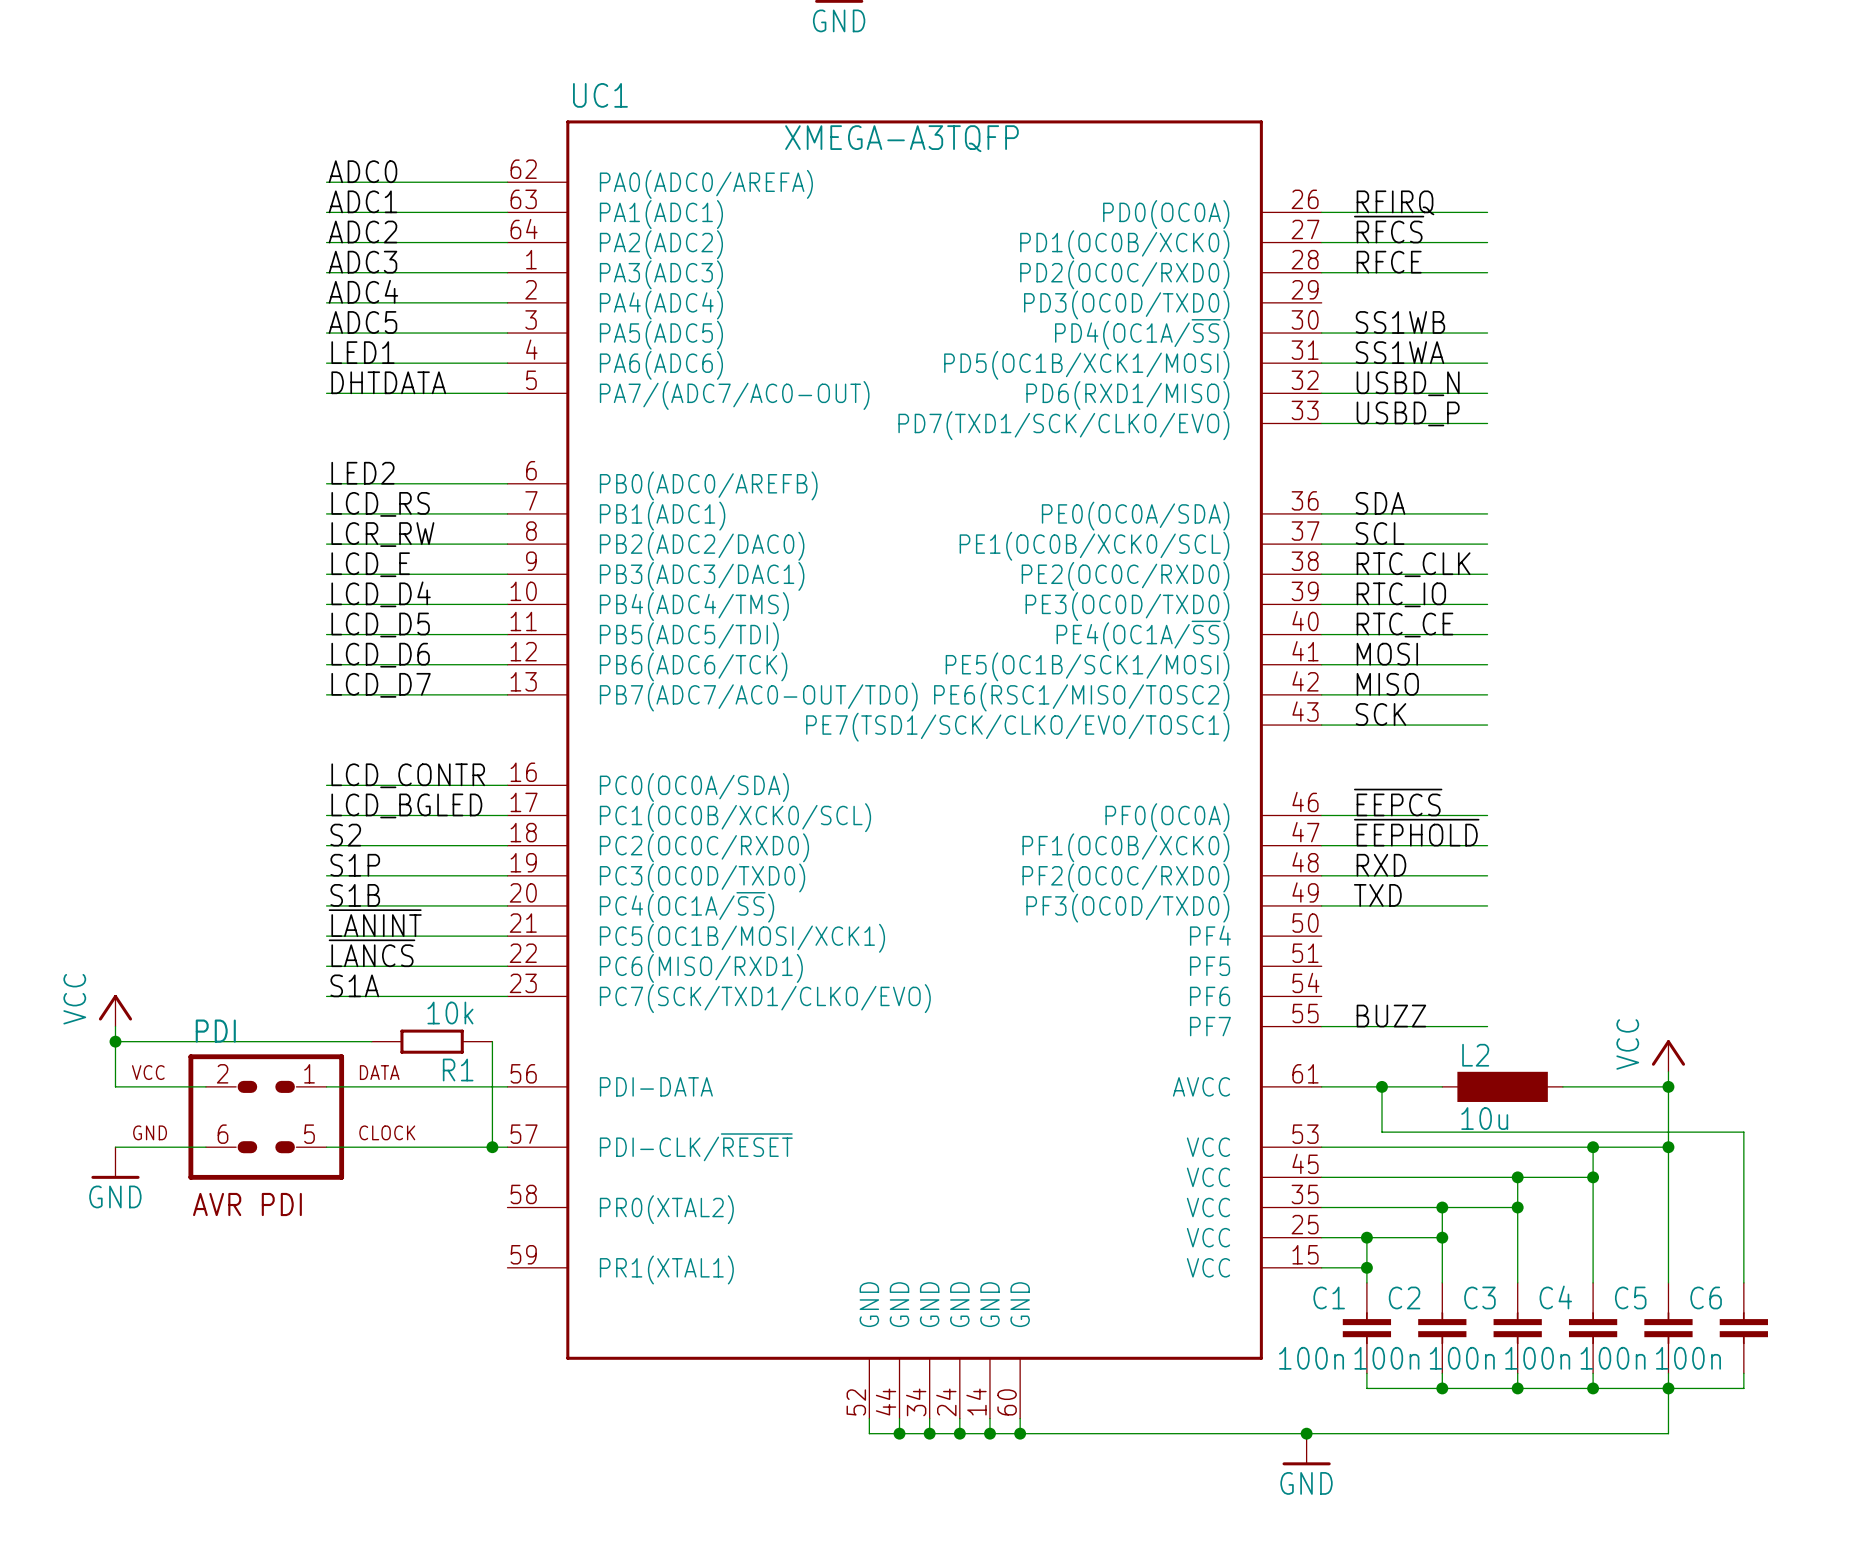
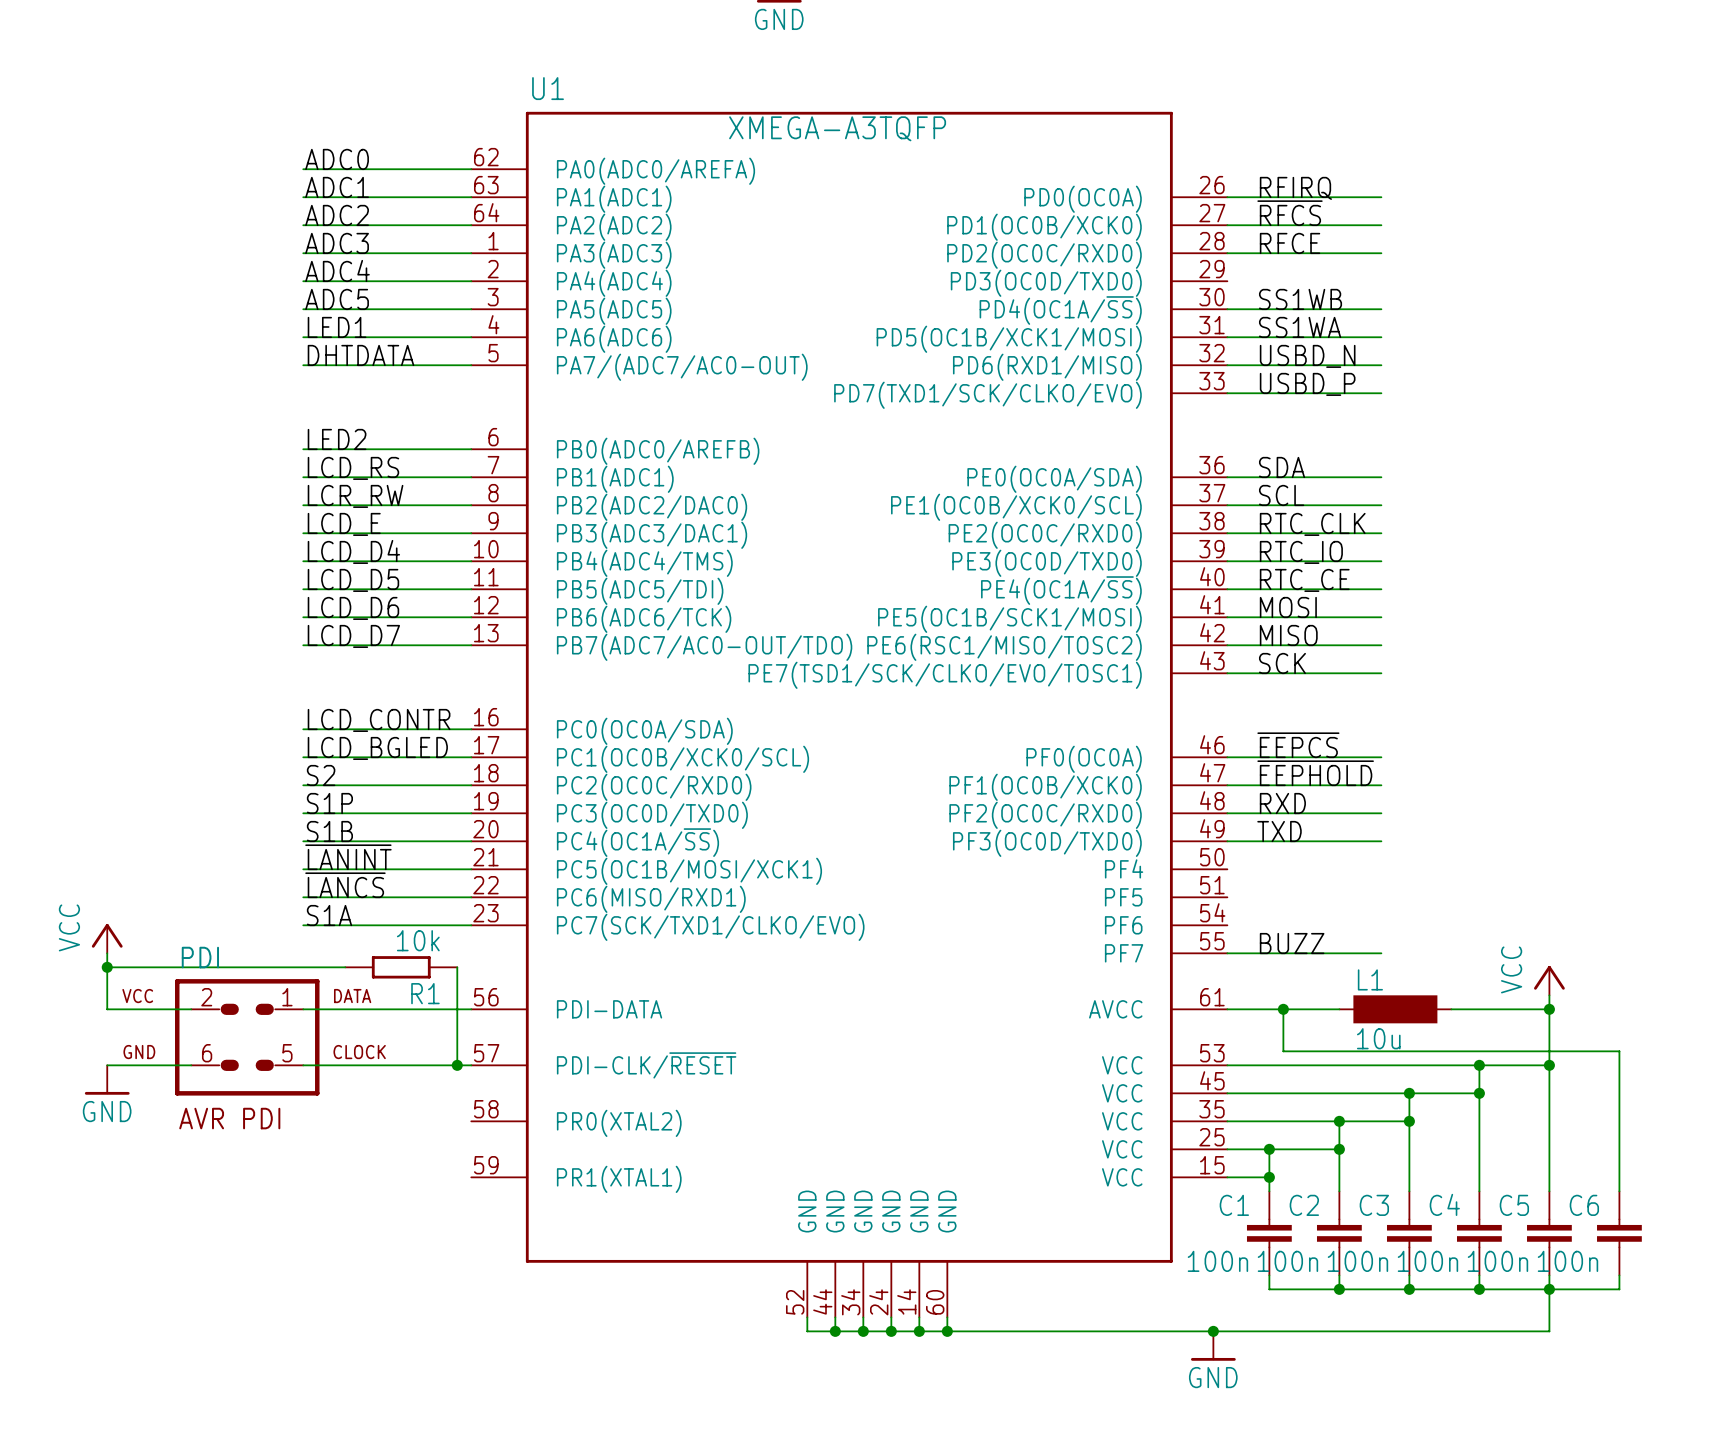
UC1 name: UC1 (600, 95) -> U1 (548, 88)
L2 name: L2 (1475, 1055) -> L1 (1370, 979)

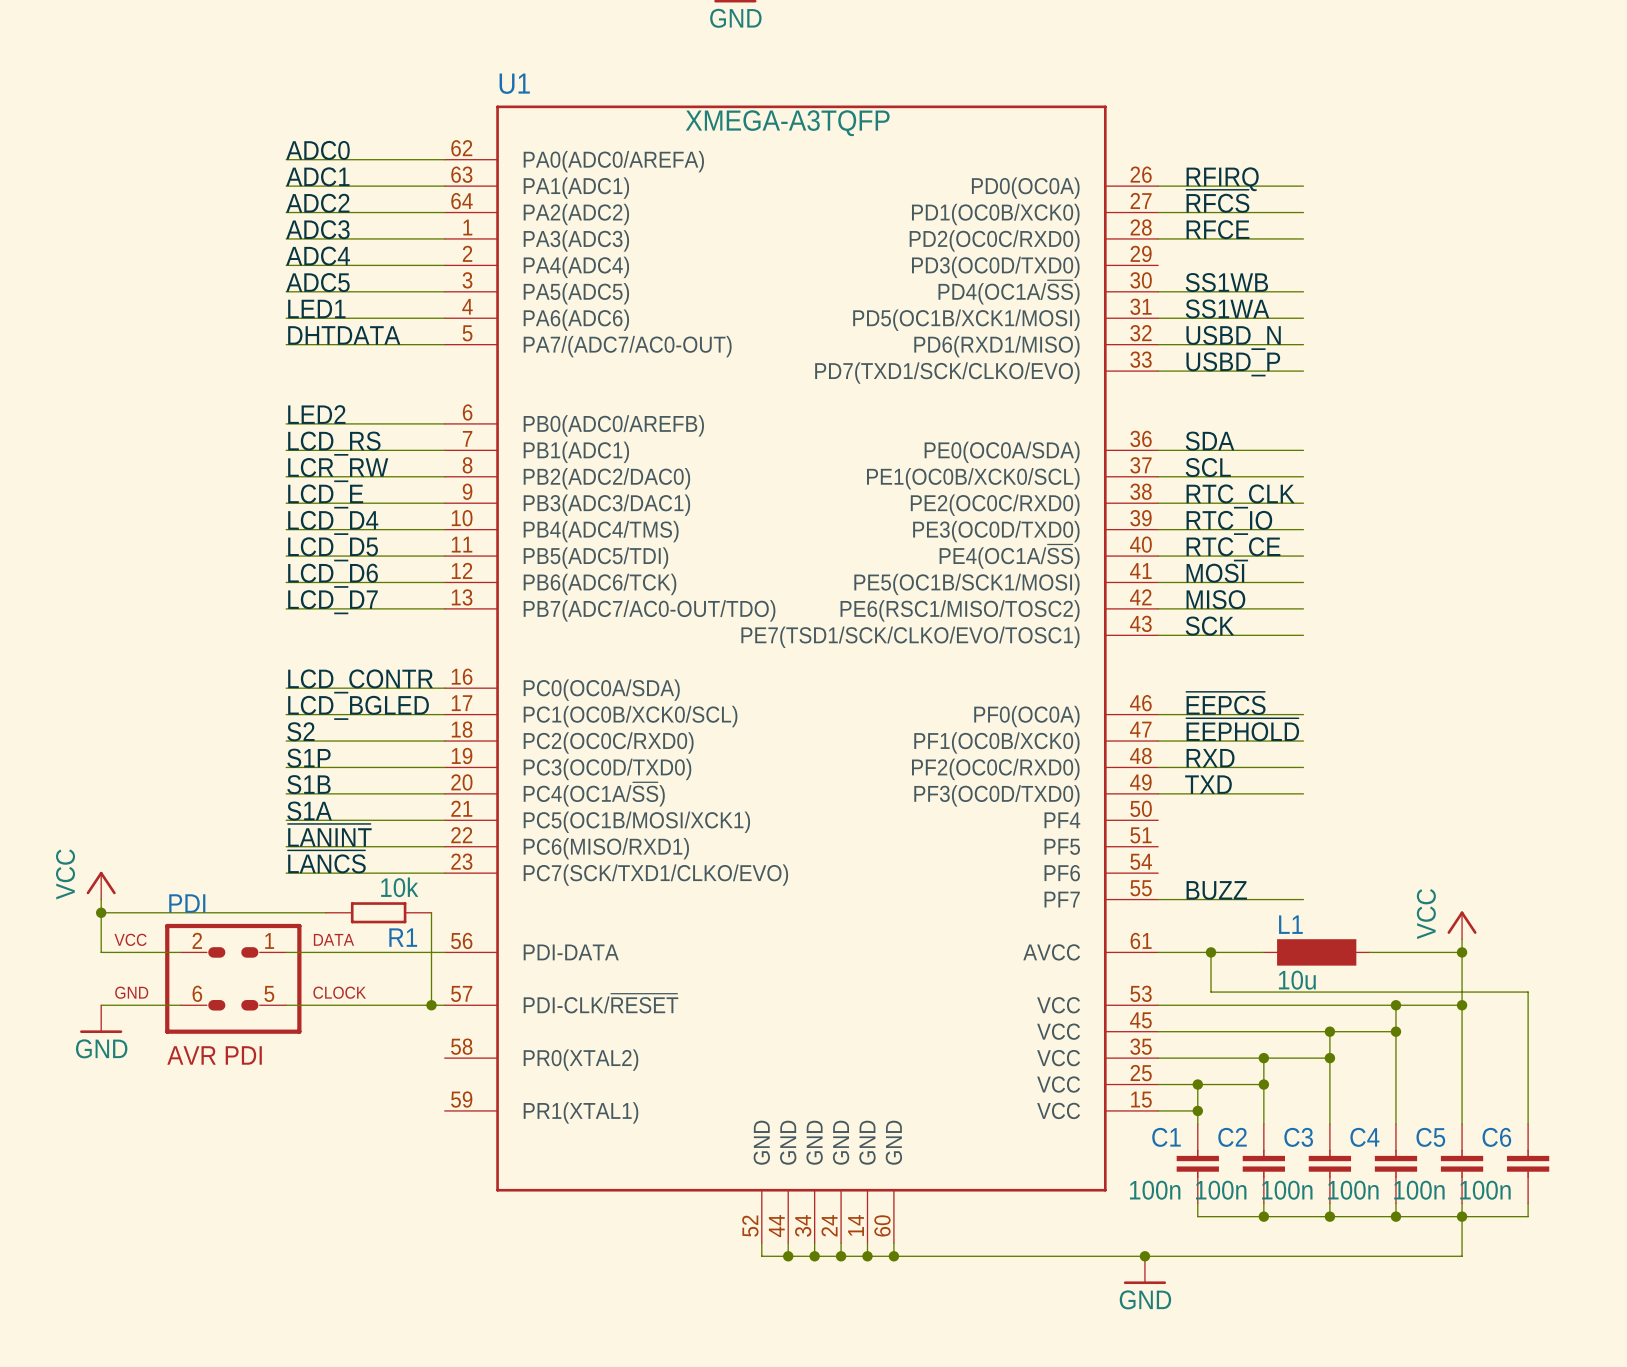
label: ~{LANINT} (348, 857) -> S1A (309, 811)
label: ~{LANCS} (345, 885) -> ~{LANINT} (329, 835)
label: S1A (329, 915) -> ~{LANCS} (326, 861)

